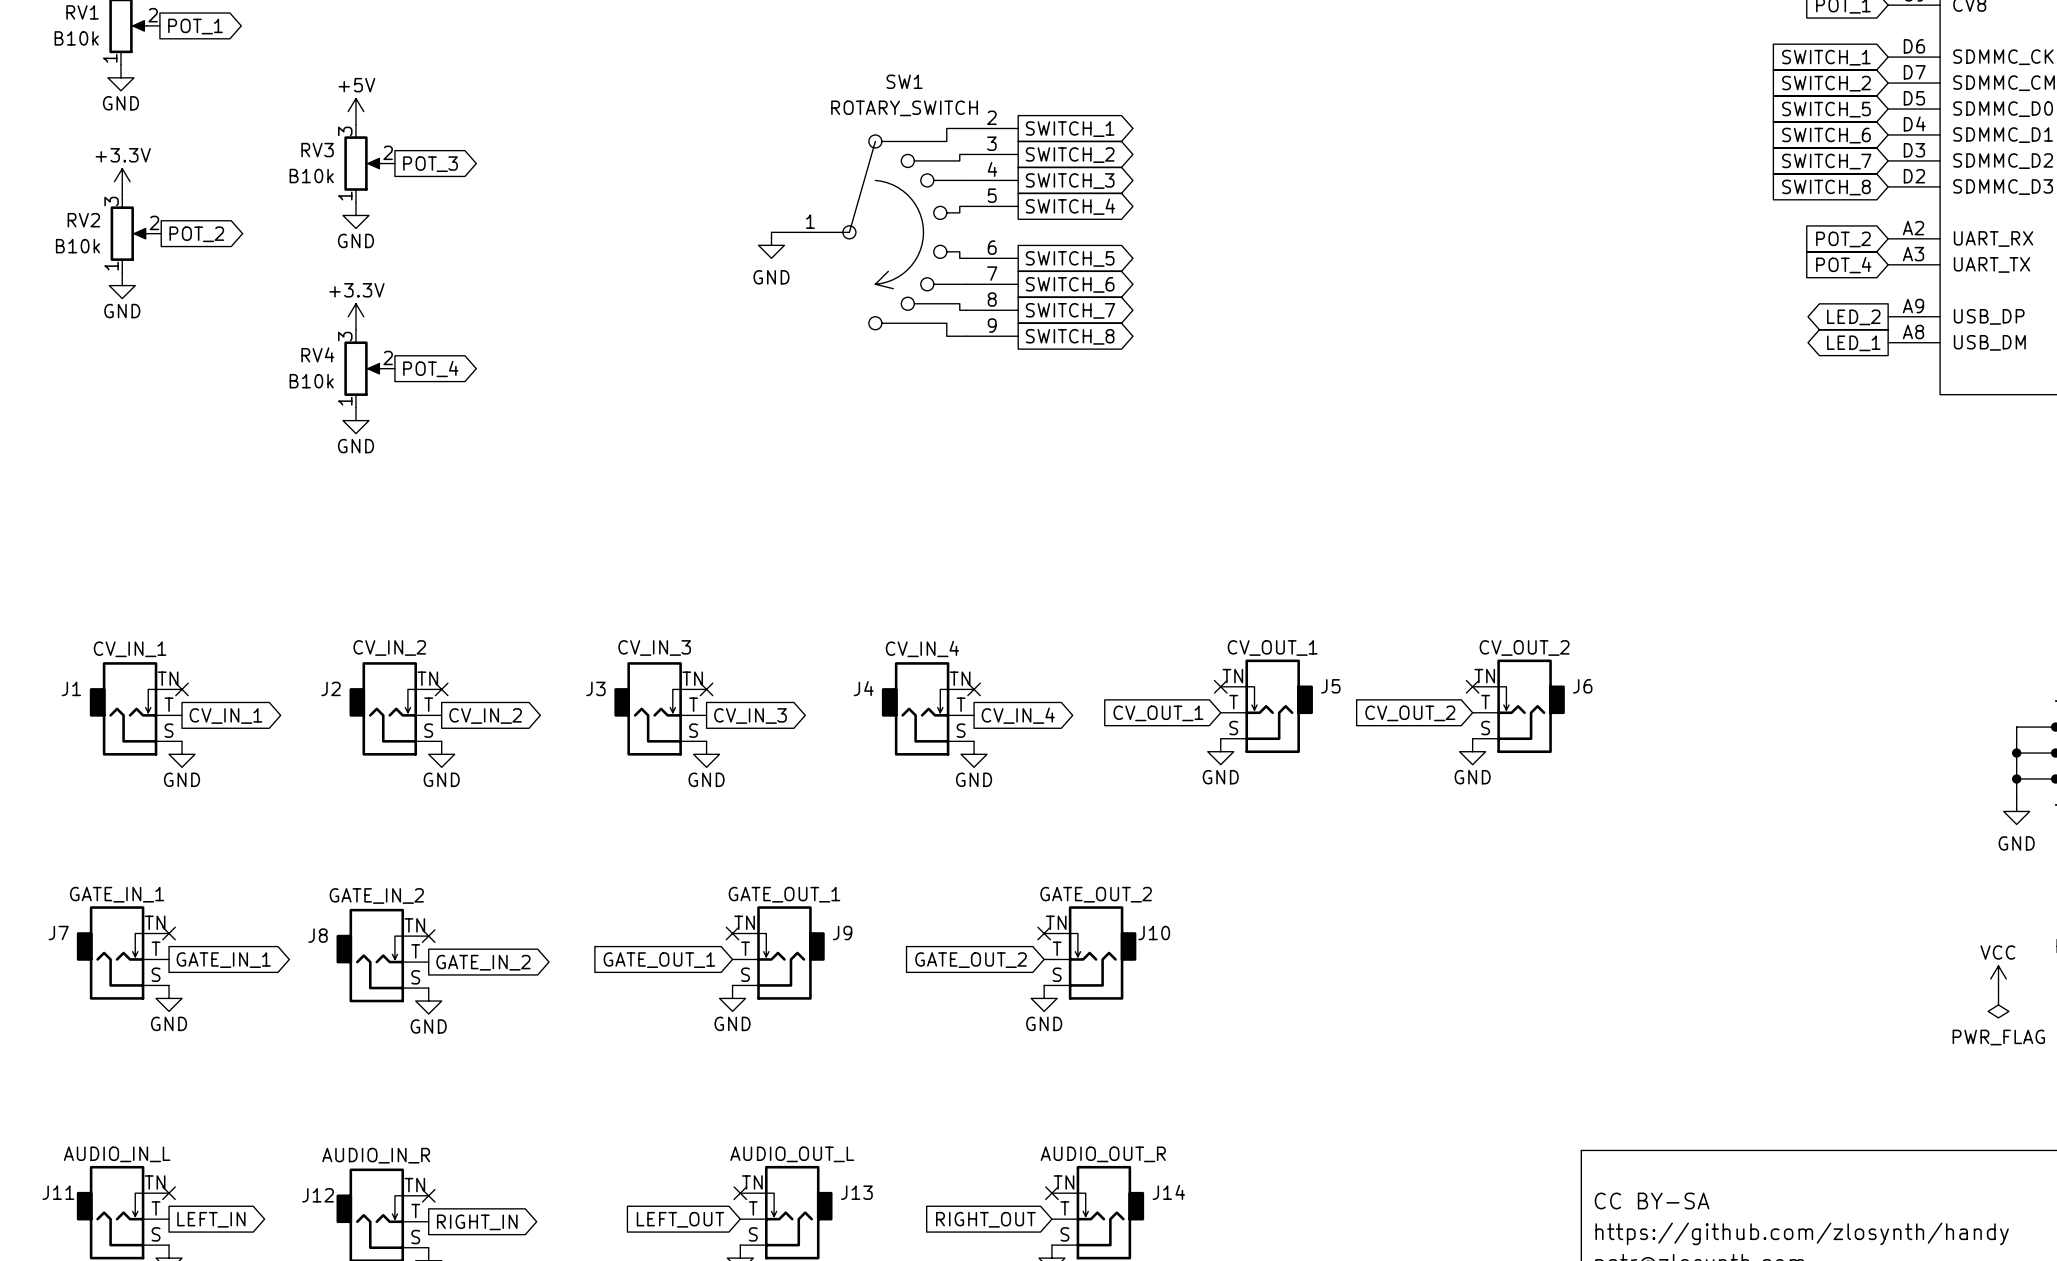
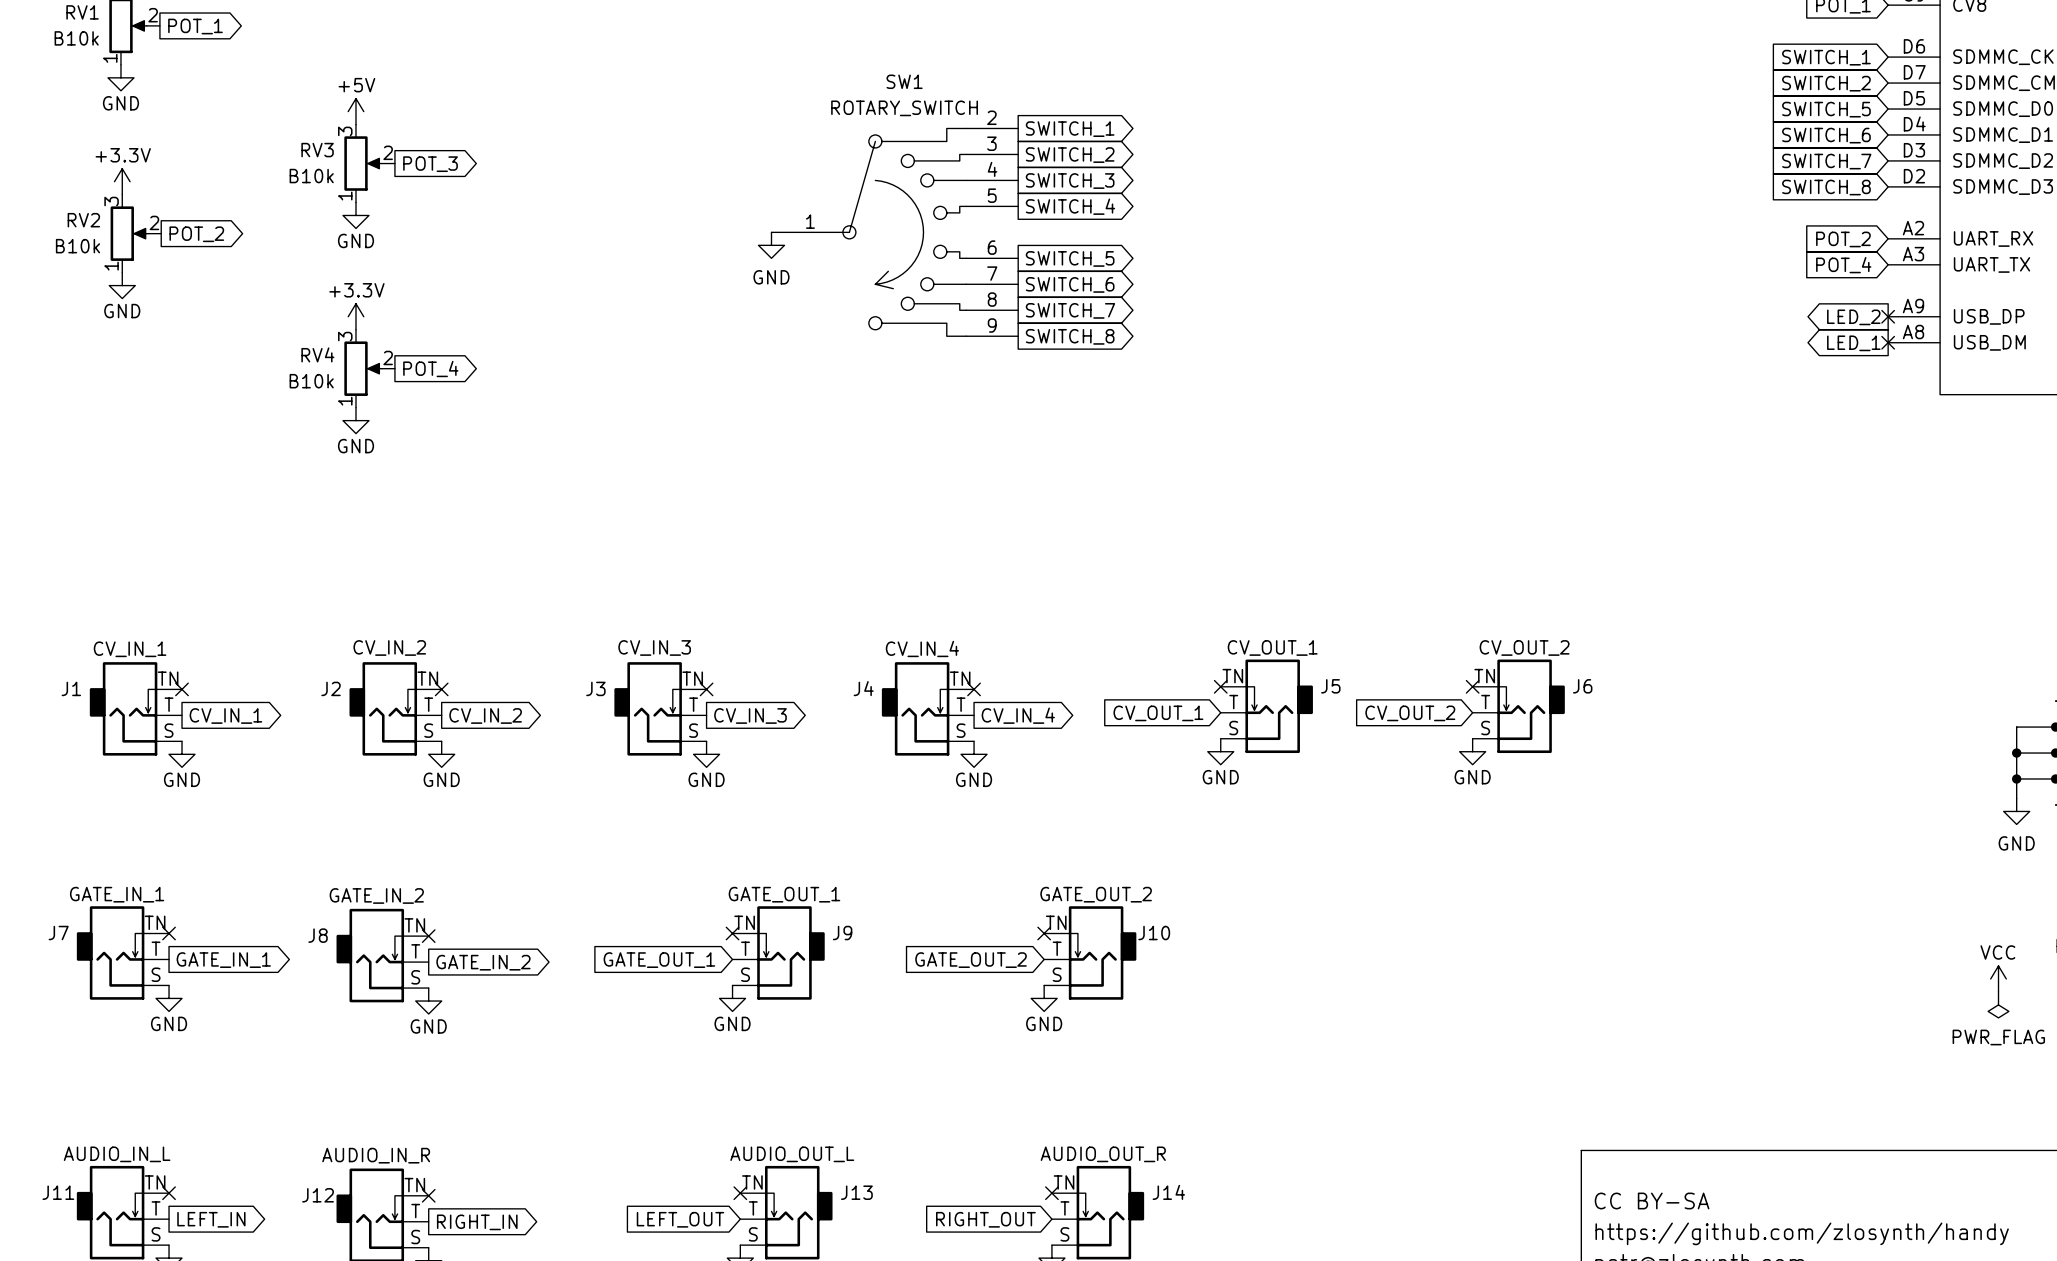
no-connect mark: none -> (1888, 316)
no-connect mark: none -> (1888, 342)

